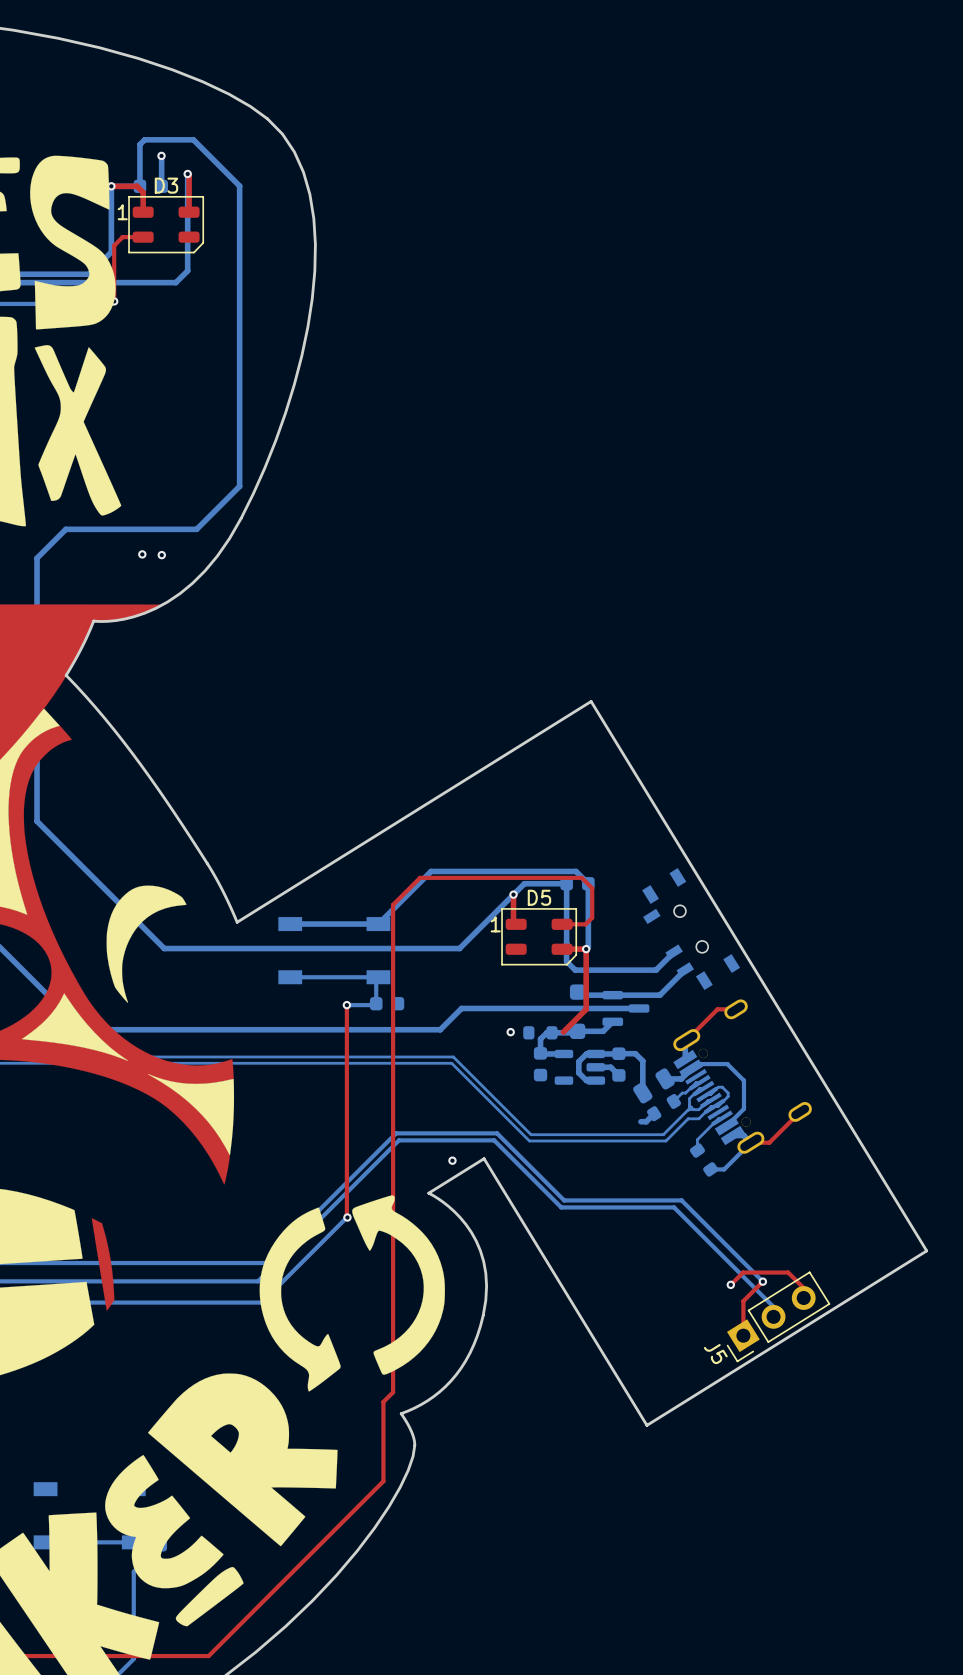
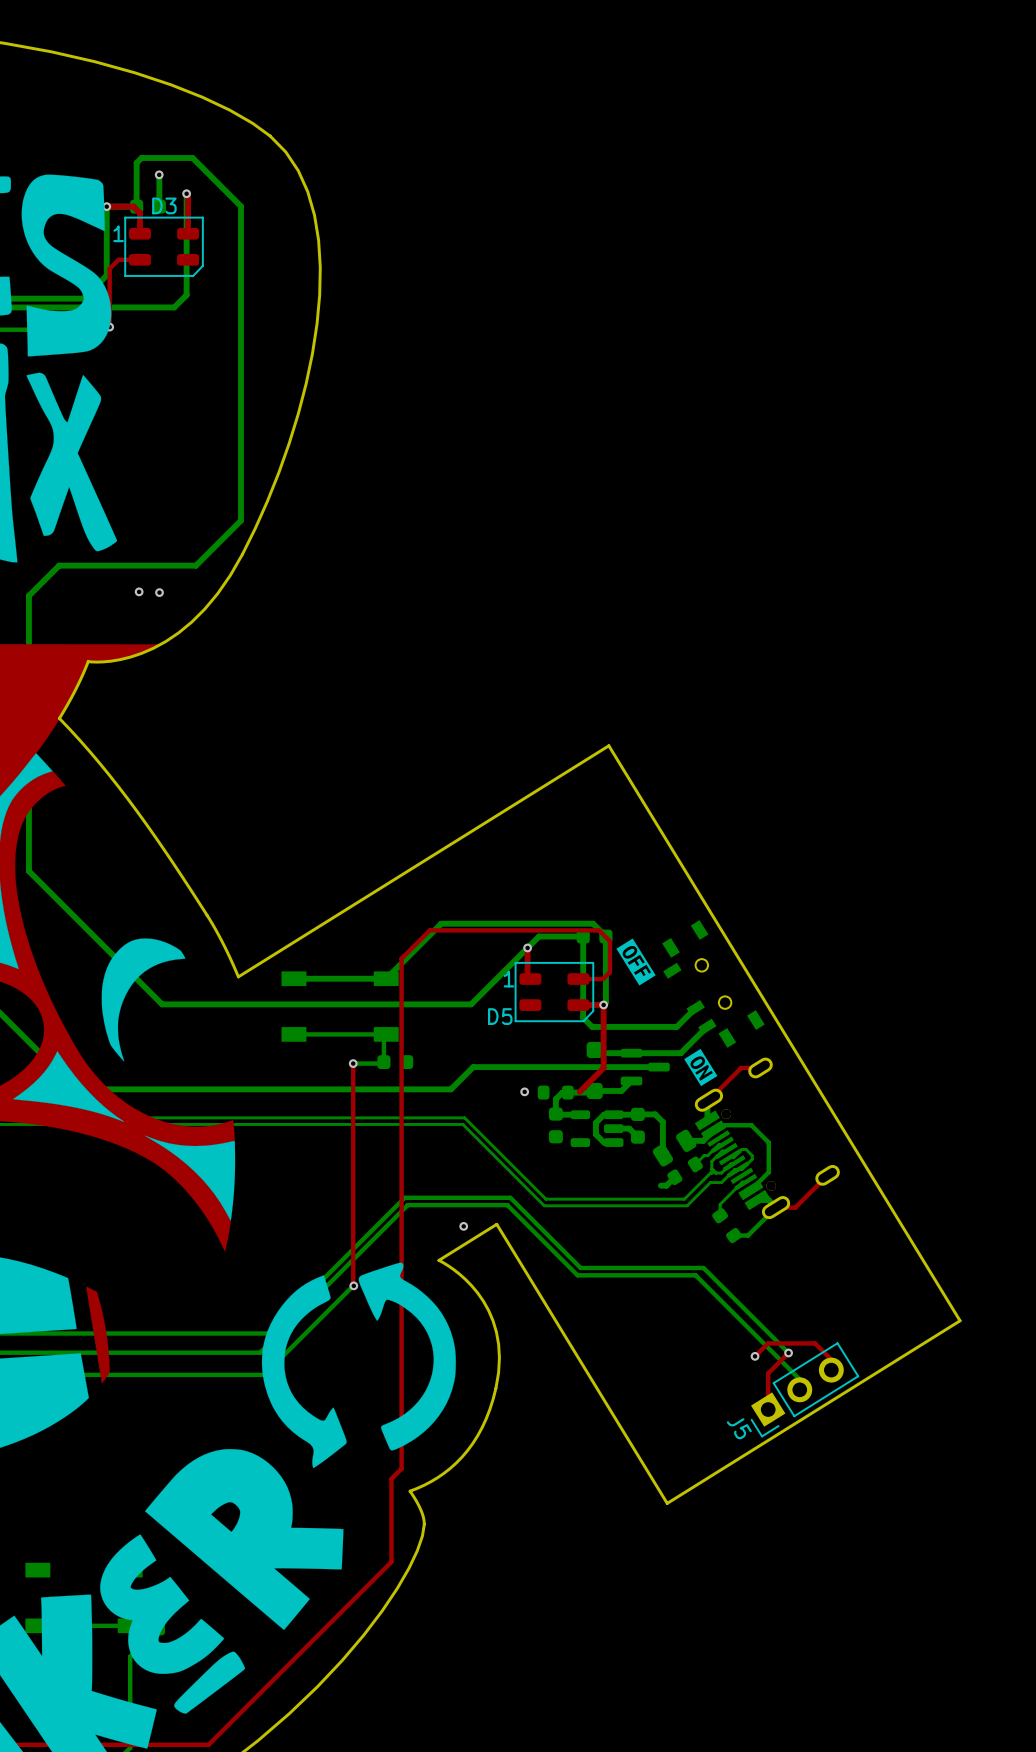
drawing: none -> [616, 938, 656, 986]
D5 name position: D5 (539, 897) -> D5 (500, 1016)
drawing: none -> [684, 1048, 718, 1087]

